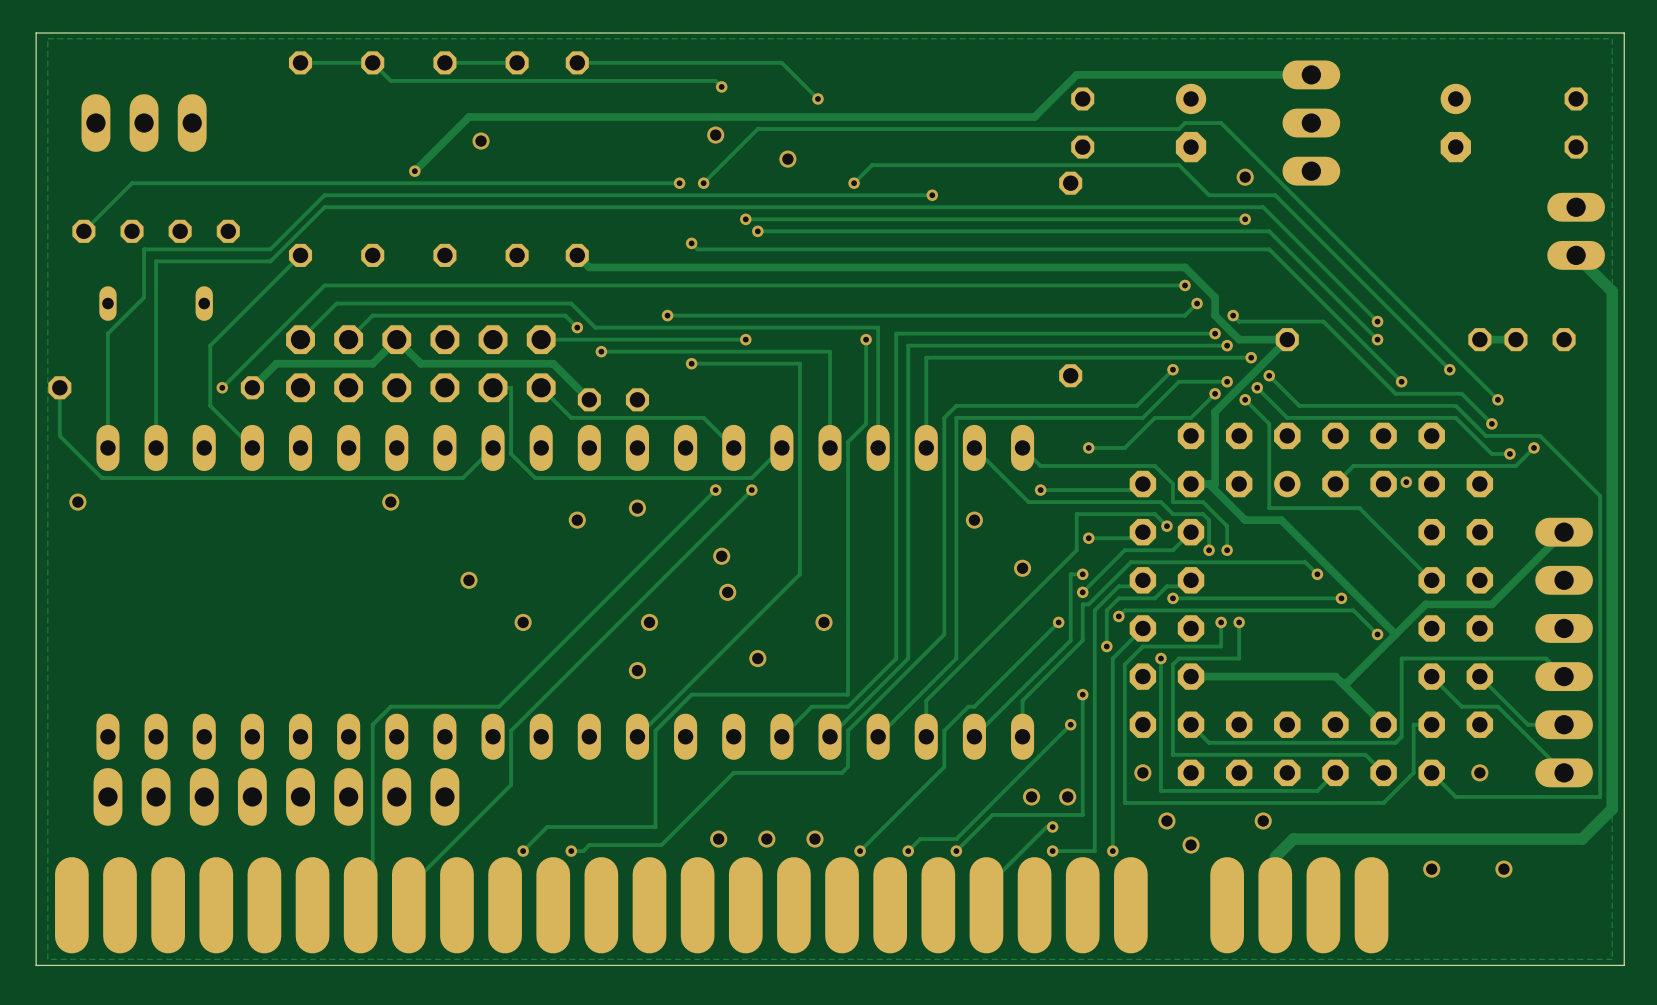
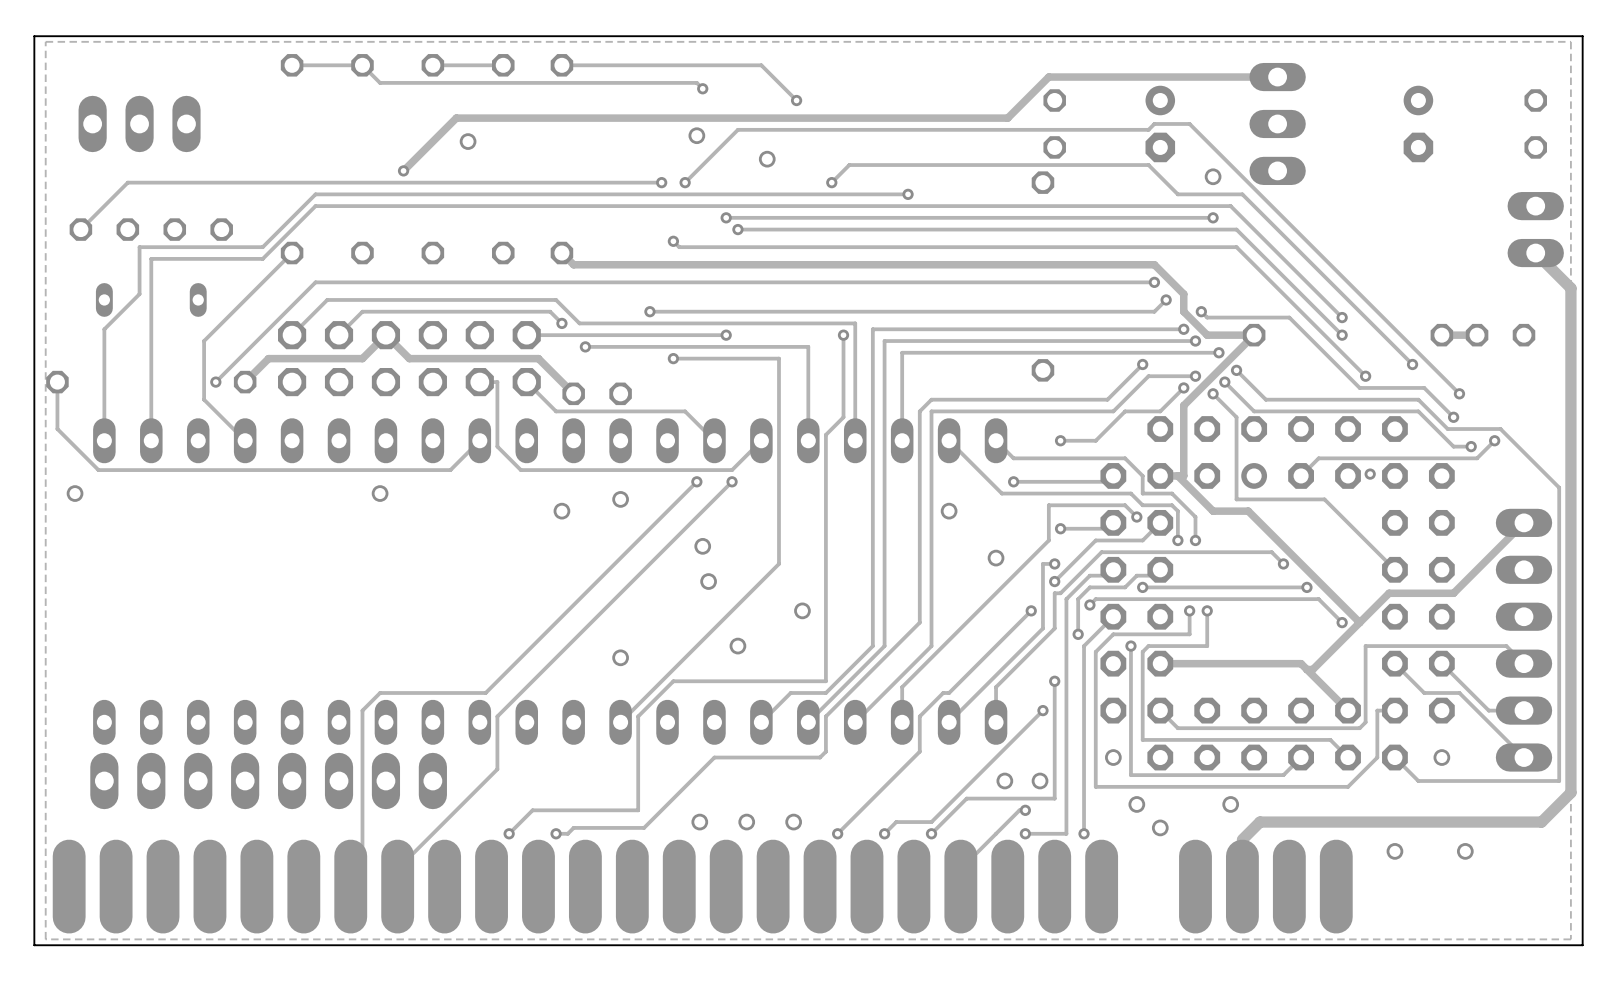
via: (468, 580) -> none
via: (523, 622) -> none
via: (649, 622) -> none

